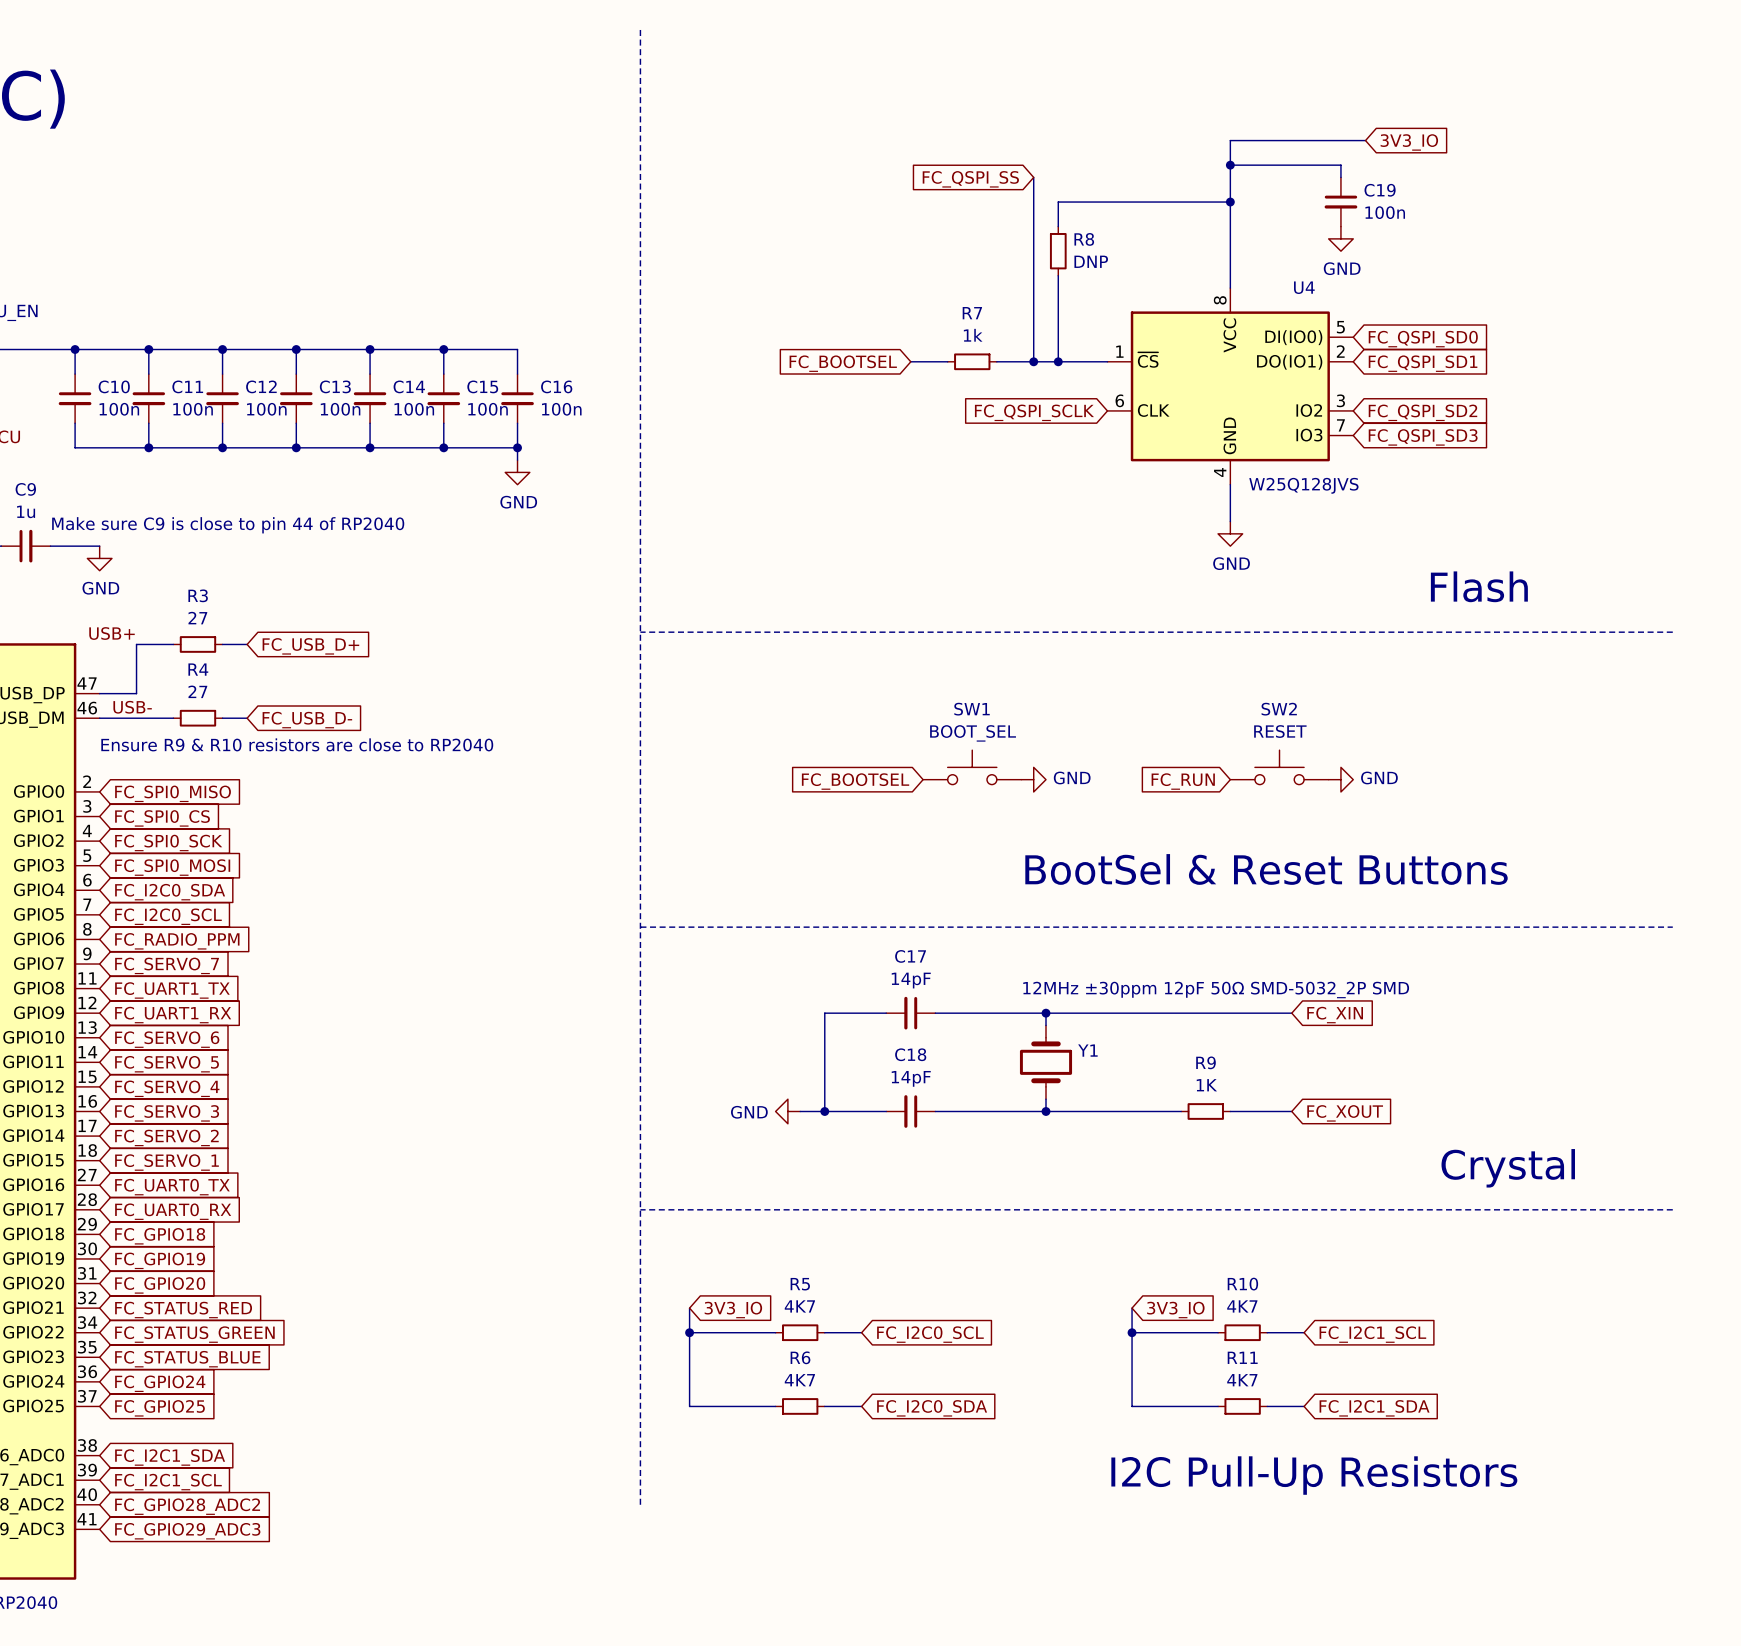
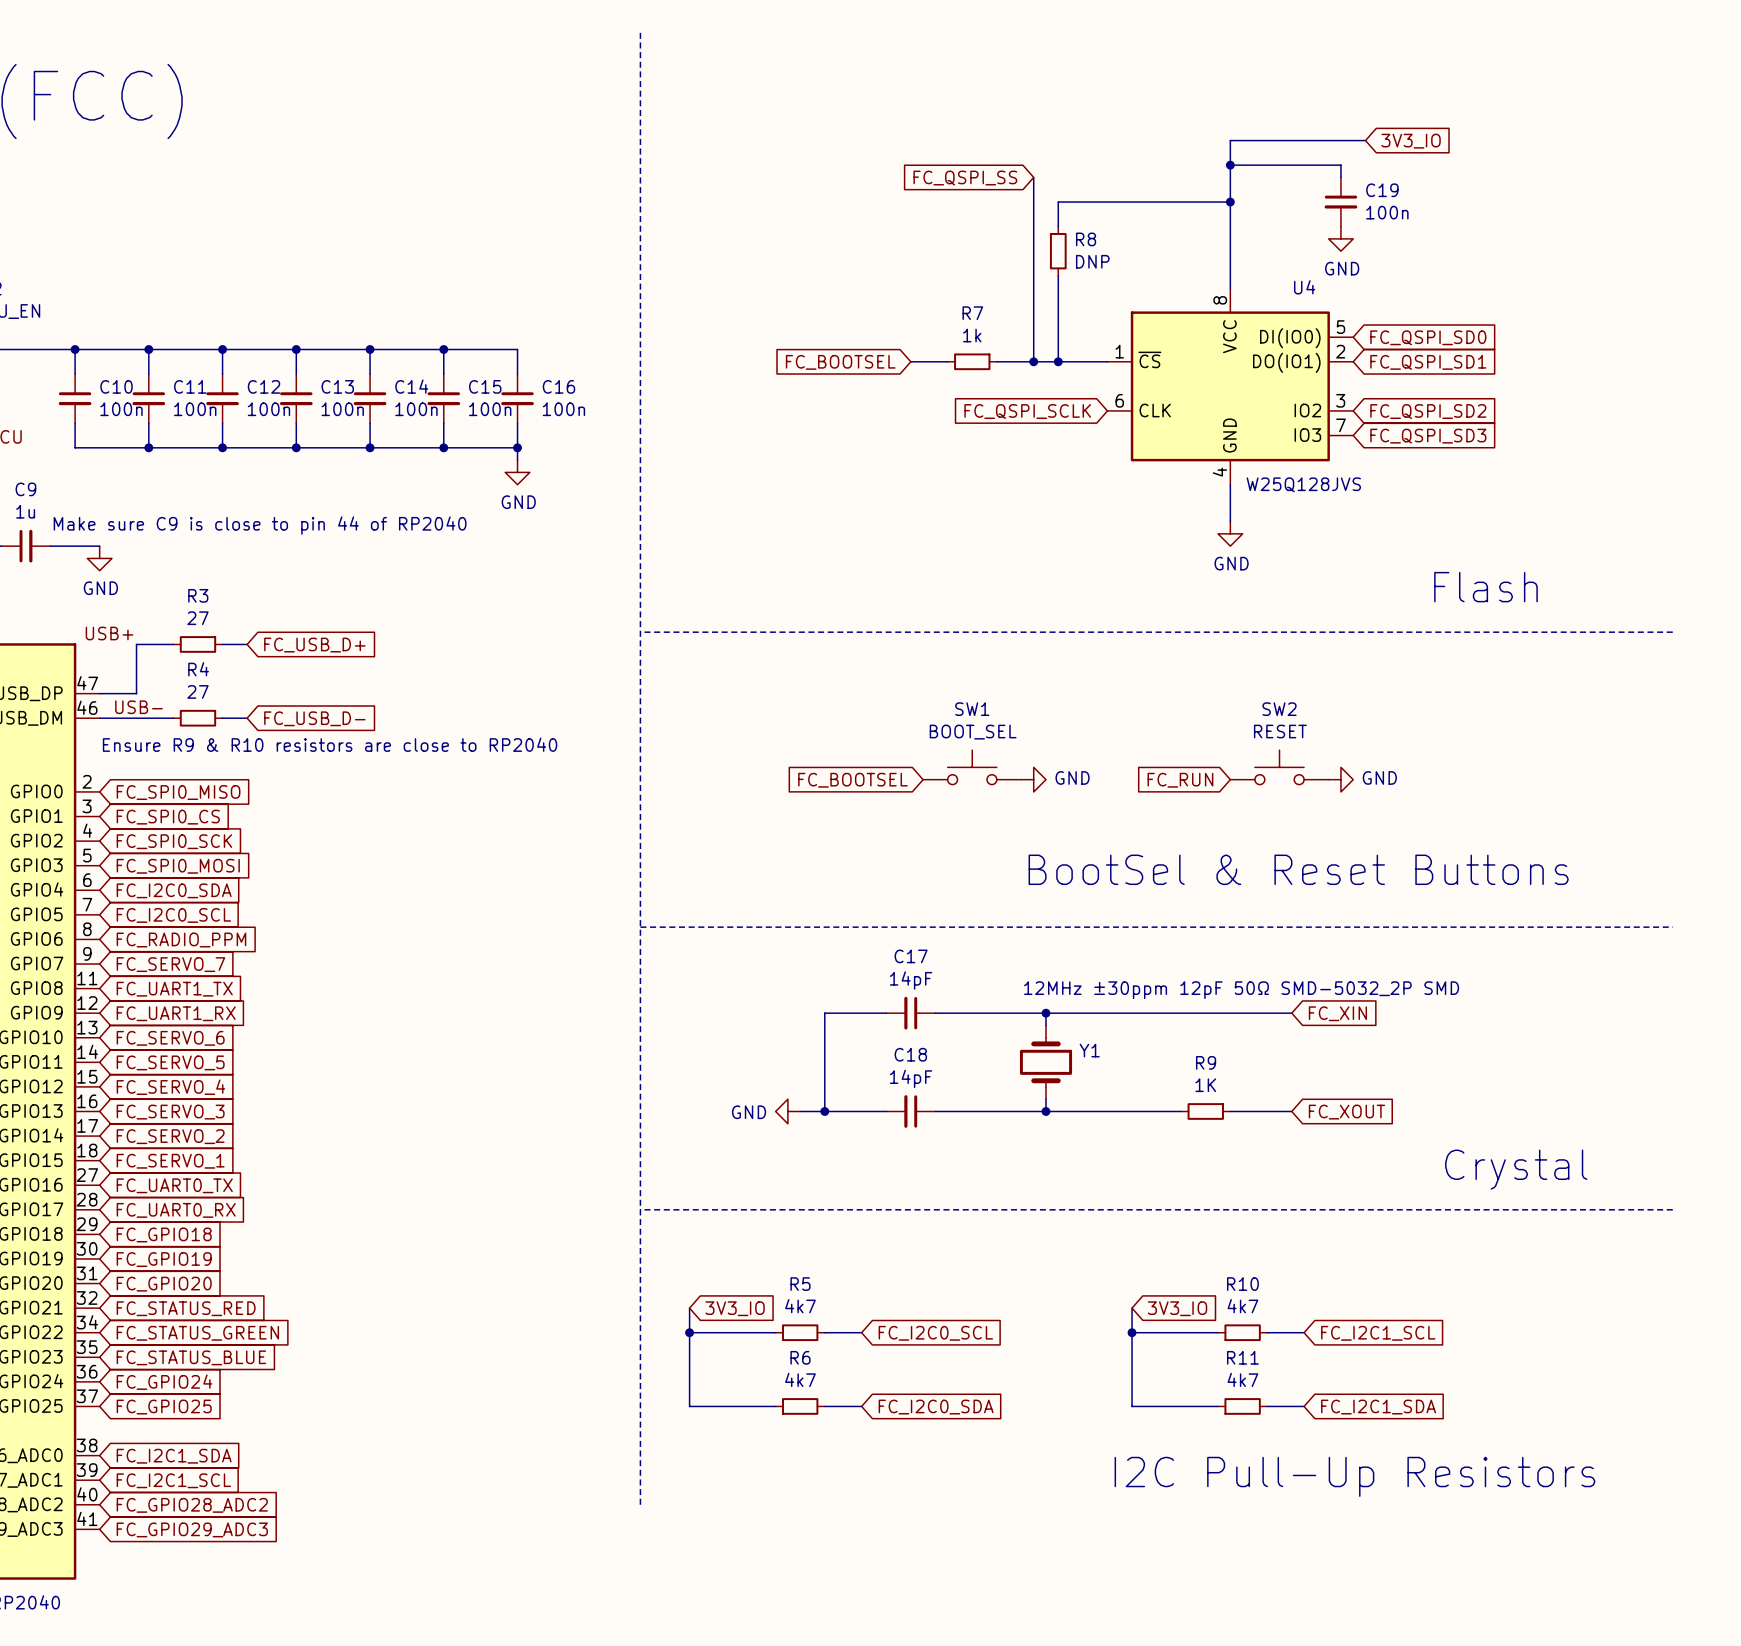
R5 value: 4K7 (799, 1306) -> 4k7 (800, 1306)
R10 value: 4K7 (1242, 1306) -> 4k7 (1242, 1306)
R6 value: 4K7 (799, 1380) -> 4k7 (800, 1379)
R11 value: 4K7 (1242, 1380) -> 4k7 (1242, 1379)

